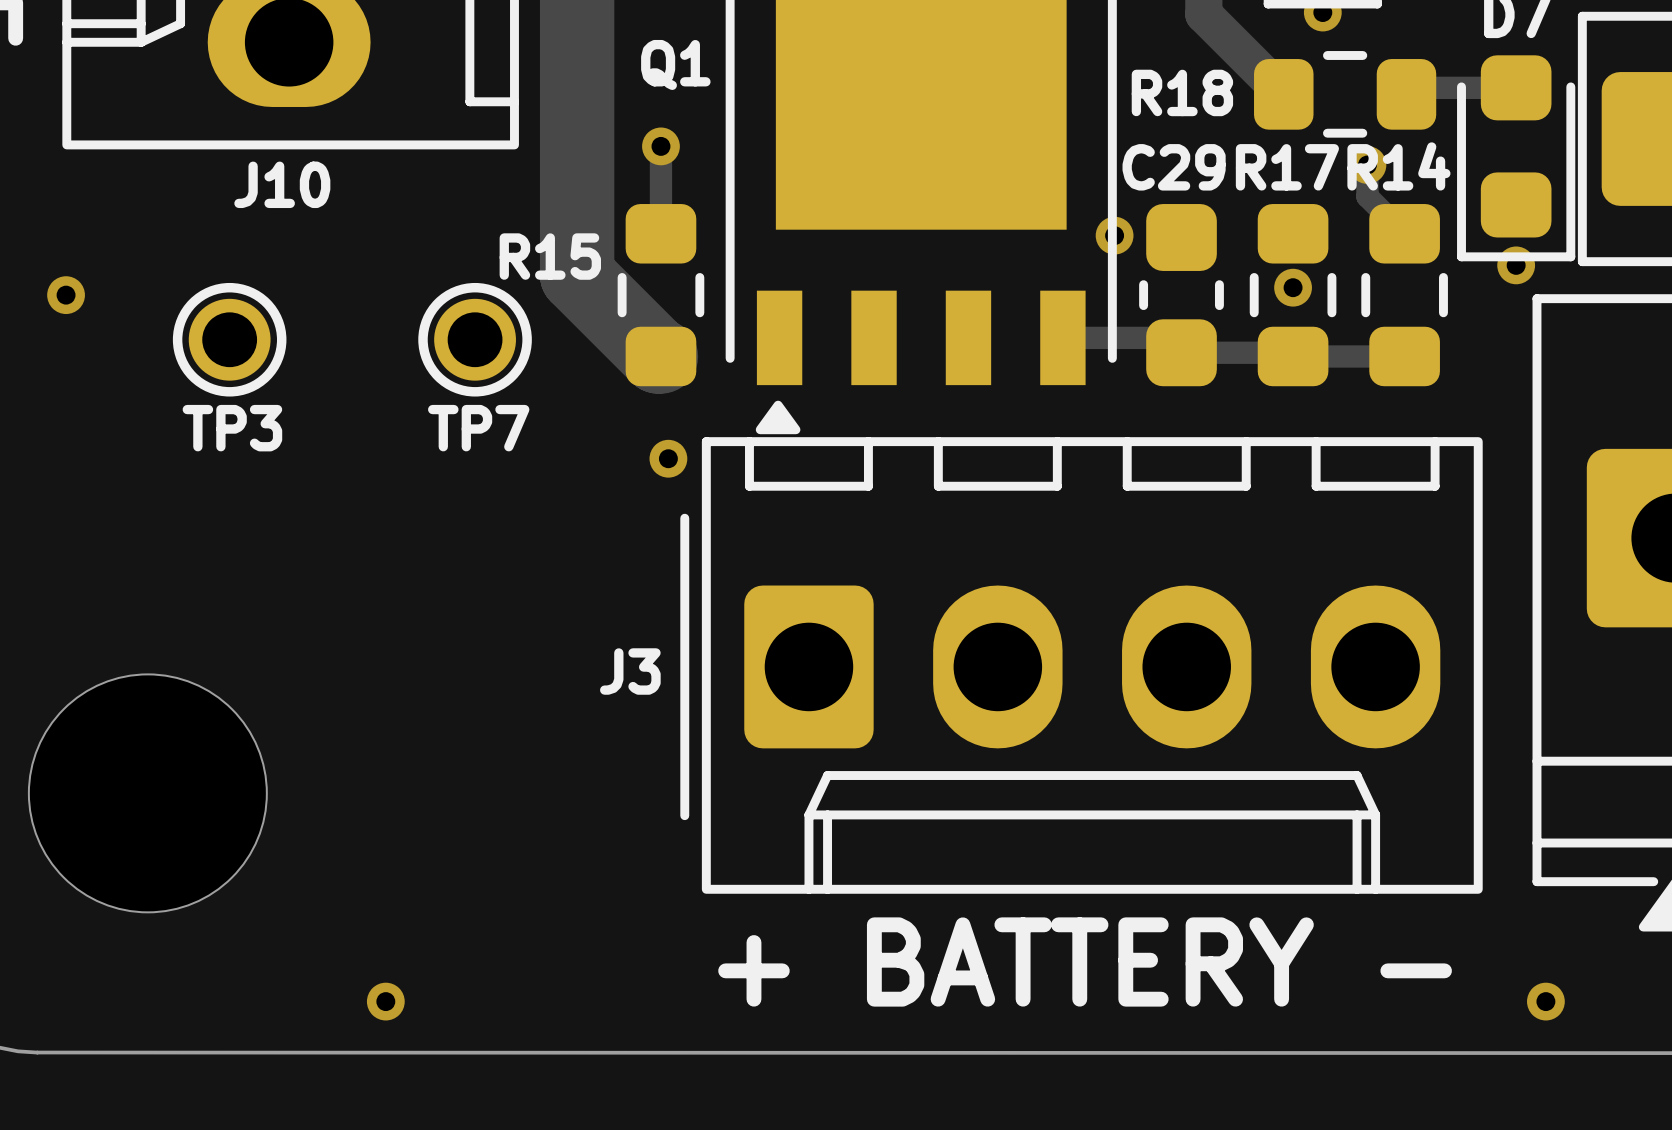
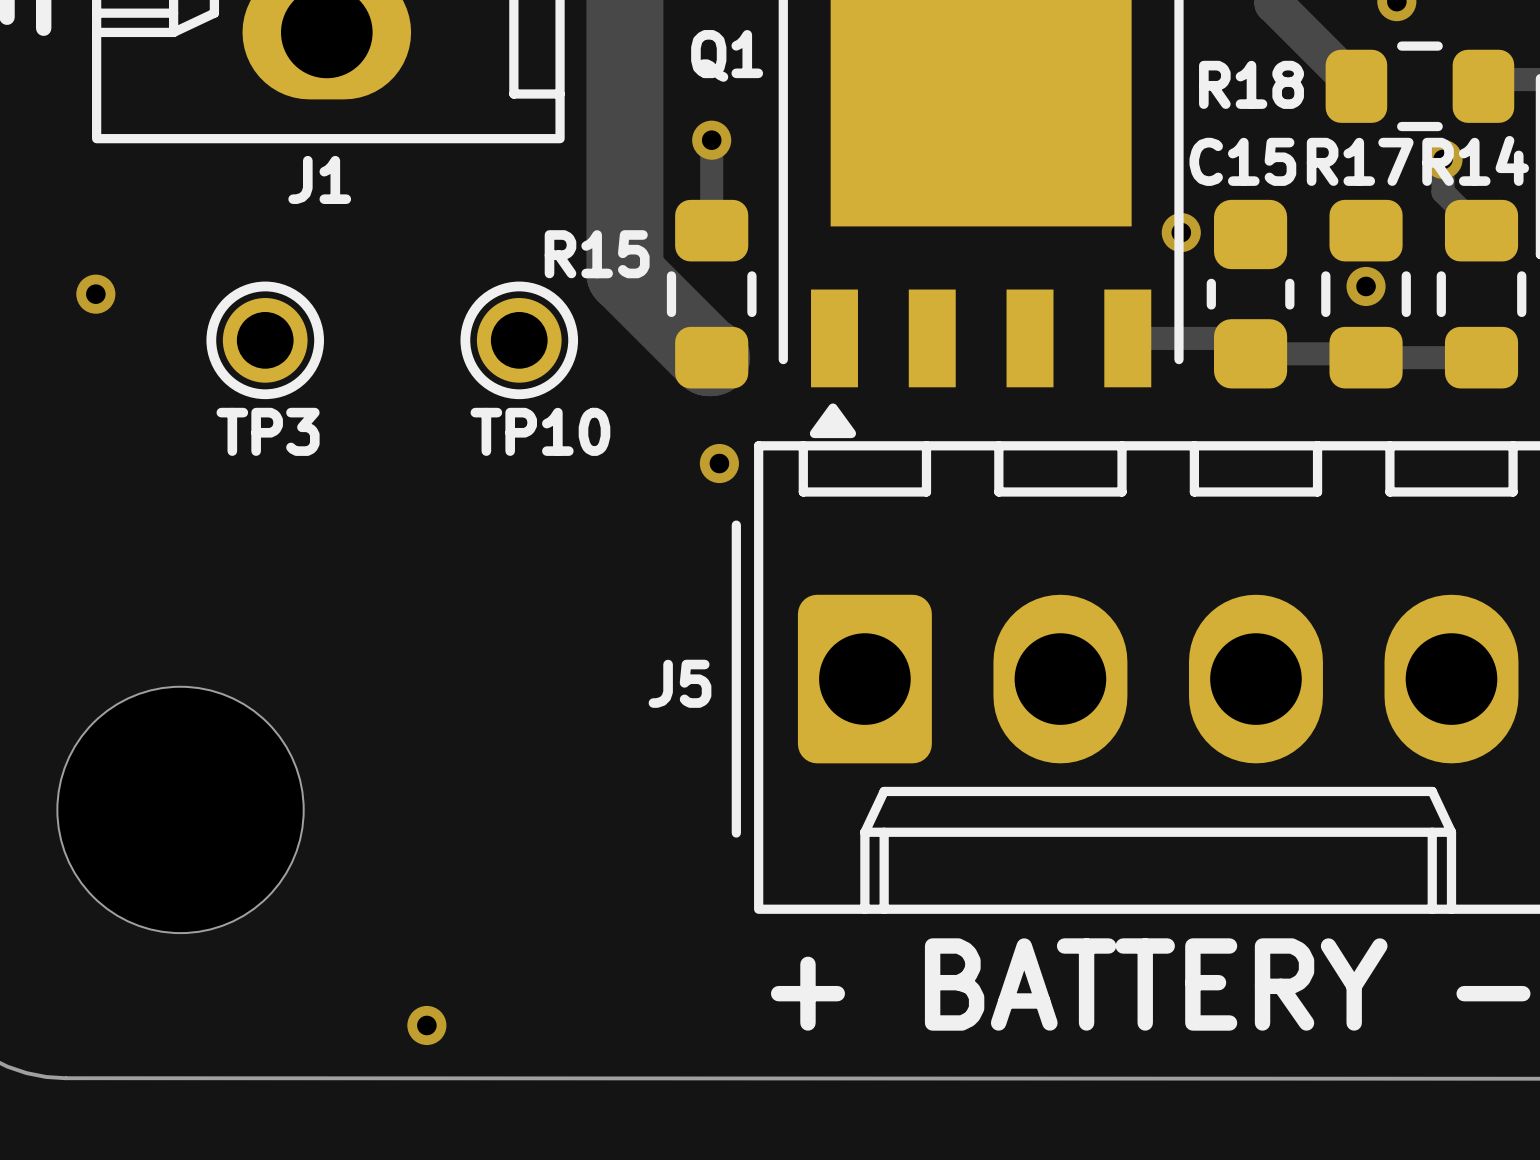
C29 name: C29 (1174, 167) -> C15 (1242, 161)
J10 name: J10 (282, 184) -> J1 (319, 179)
TP7 name: TP7 (478, 428) -> TP10 (540, 431)
J3 name: J3 (630, 671) -> J5 (679, 683)

